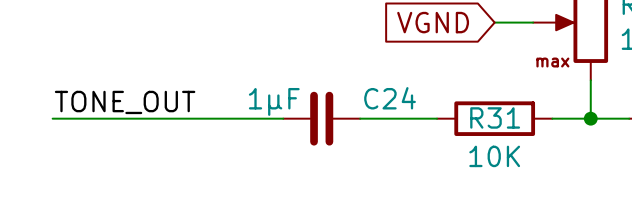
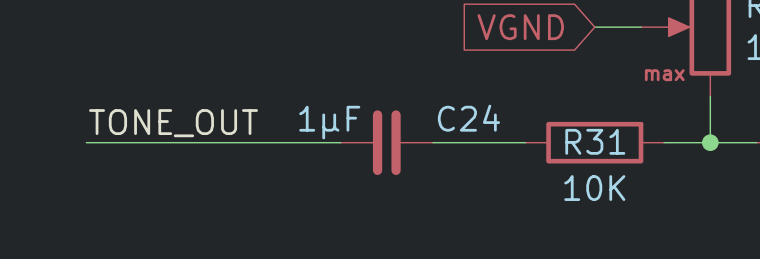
label position: TONE_OUT (125, 102) -> TONE_OUT (173, 123)
wire: (52, 118) (71, 118) -> none

